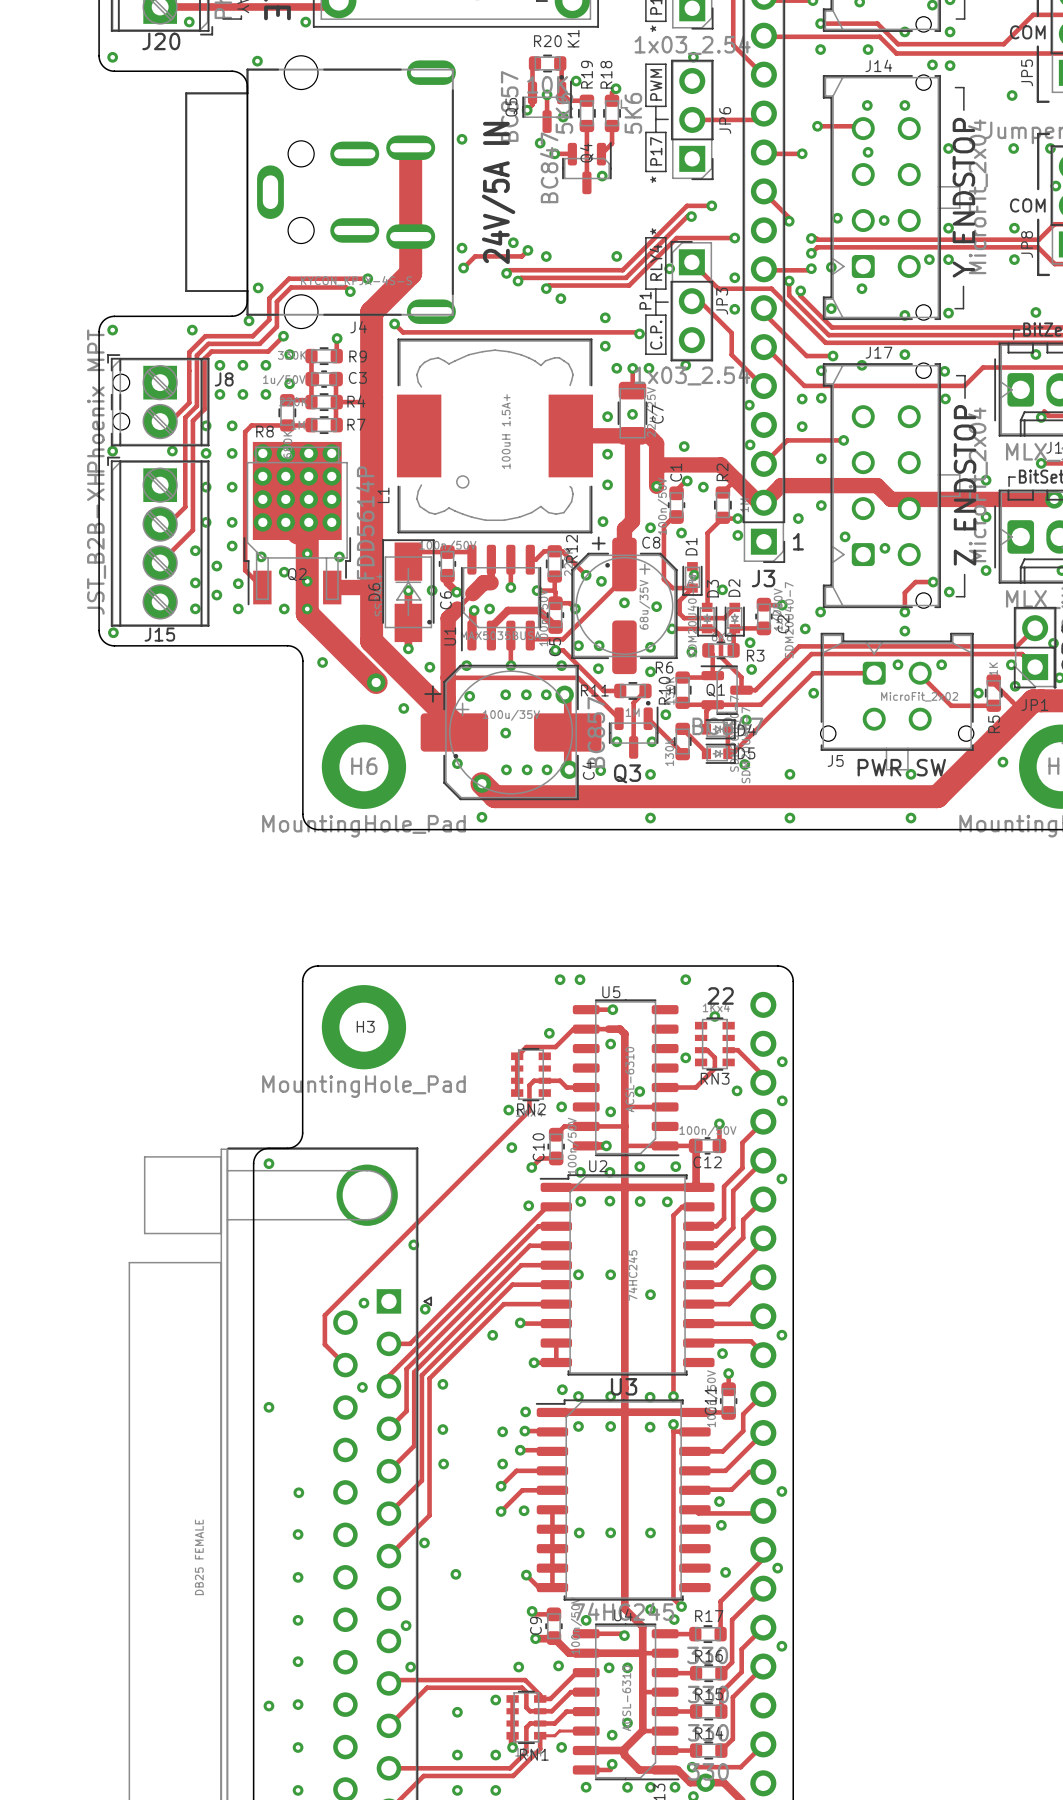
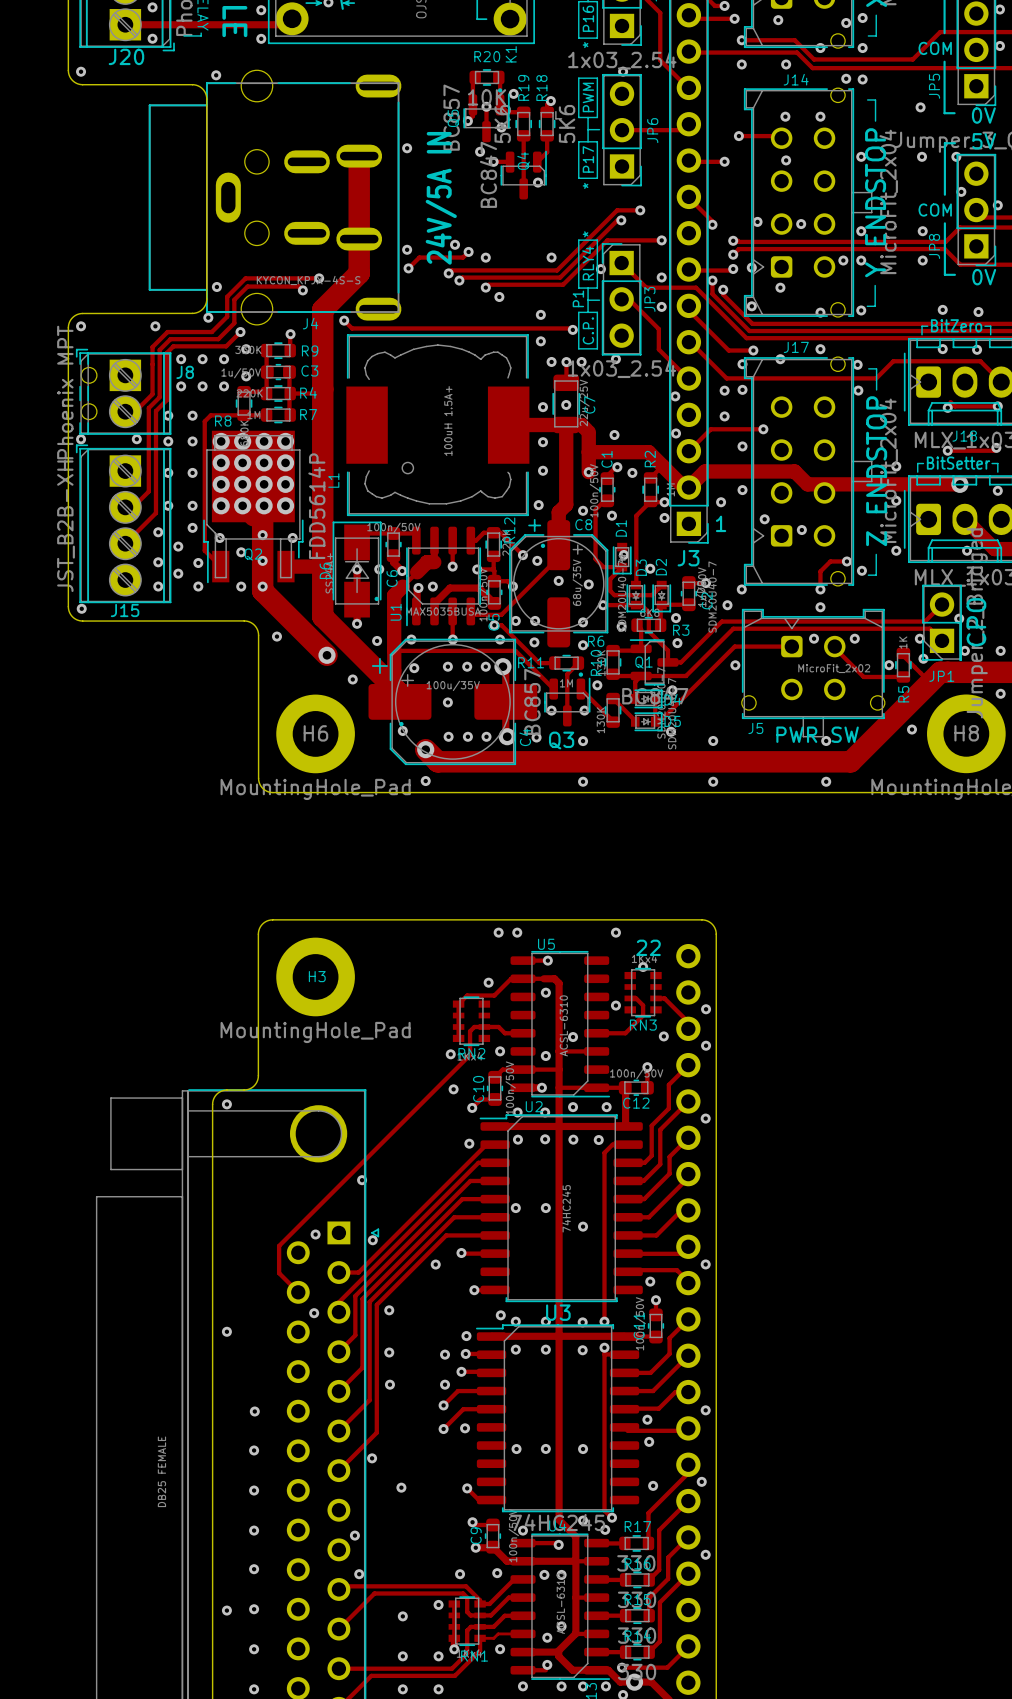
track: (556, 1343) (556, 1362) -> none
track: (552, 1509) (552, 1587) -> none

